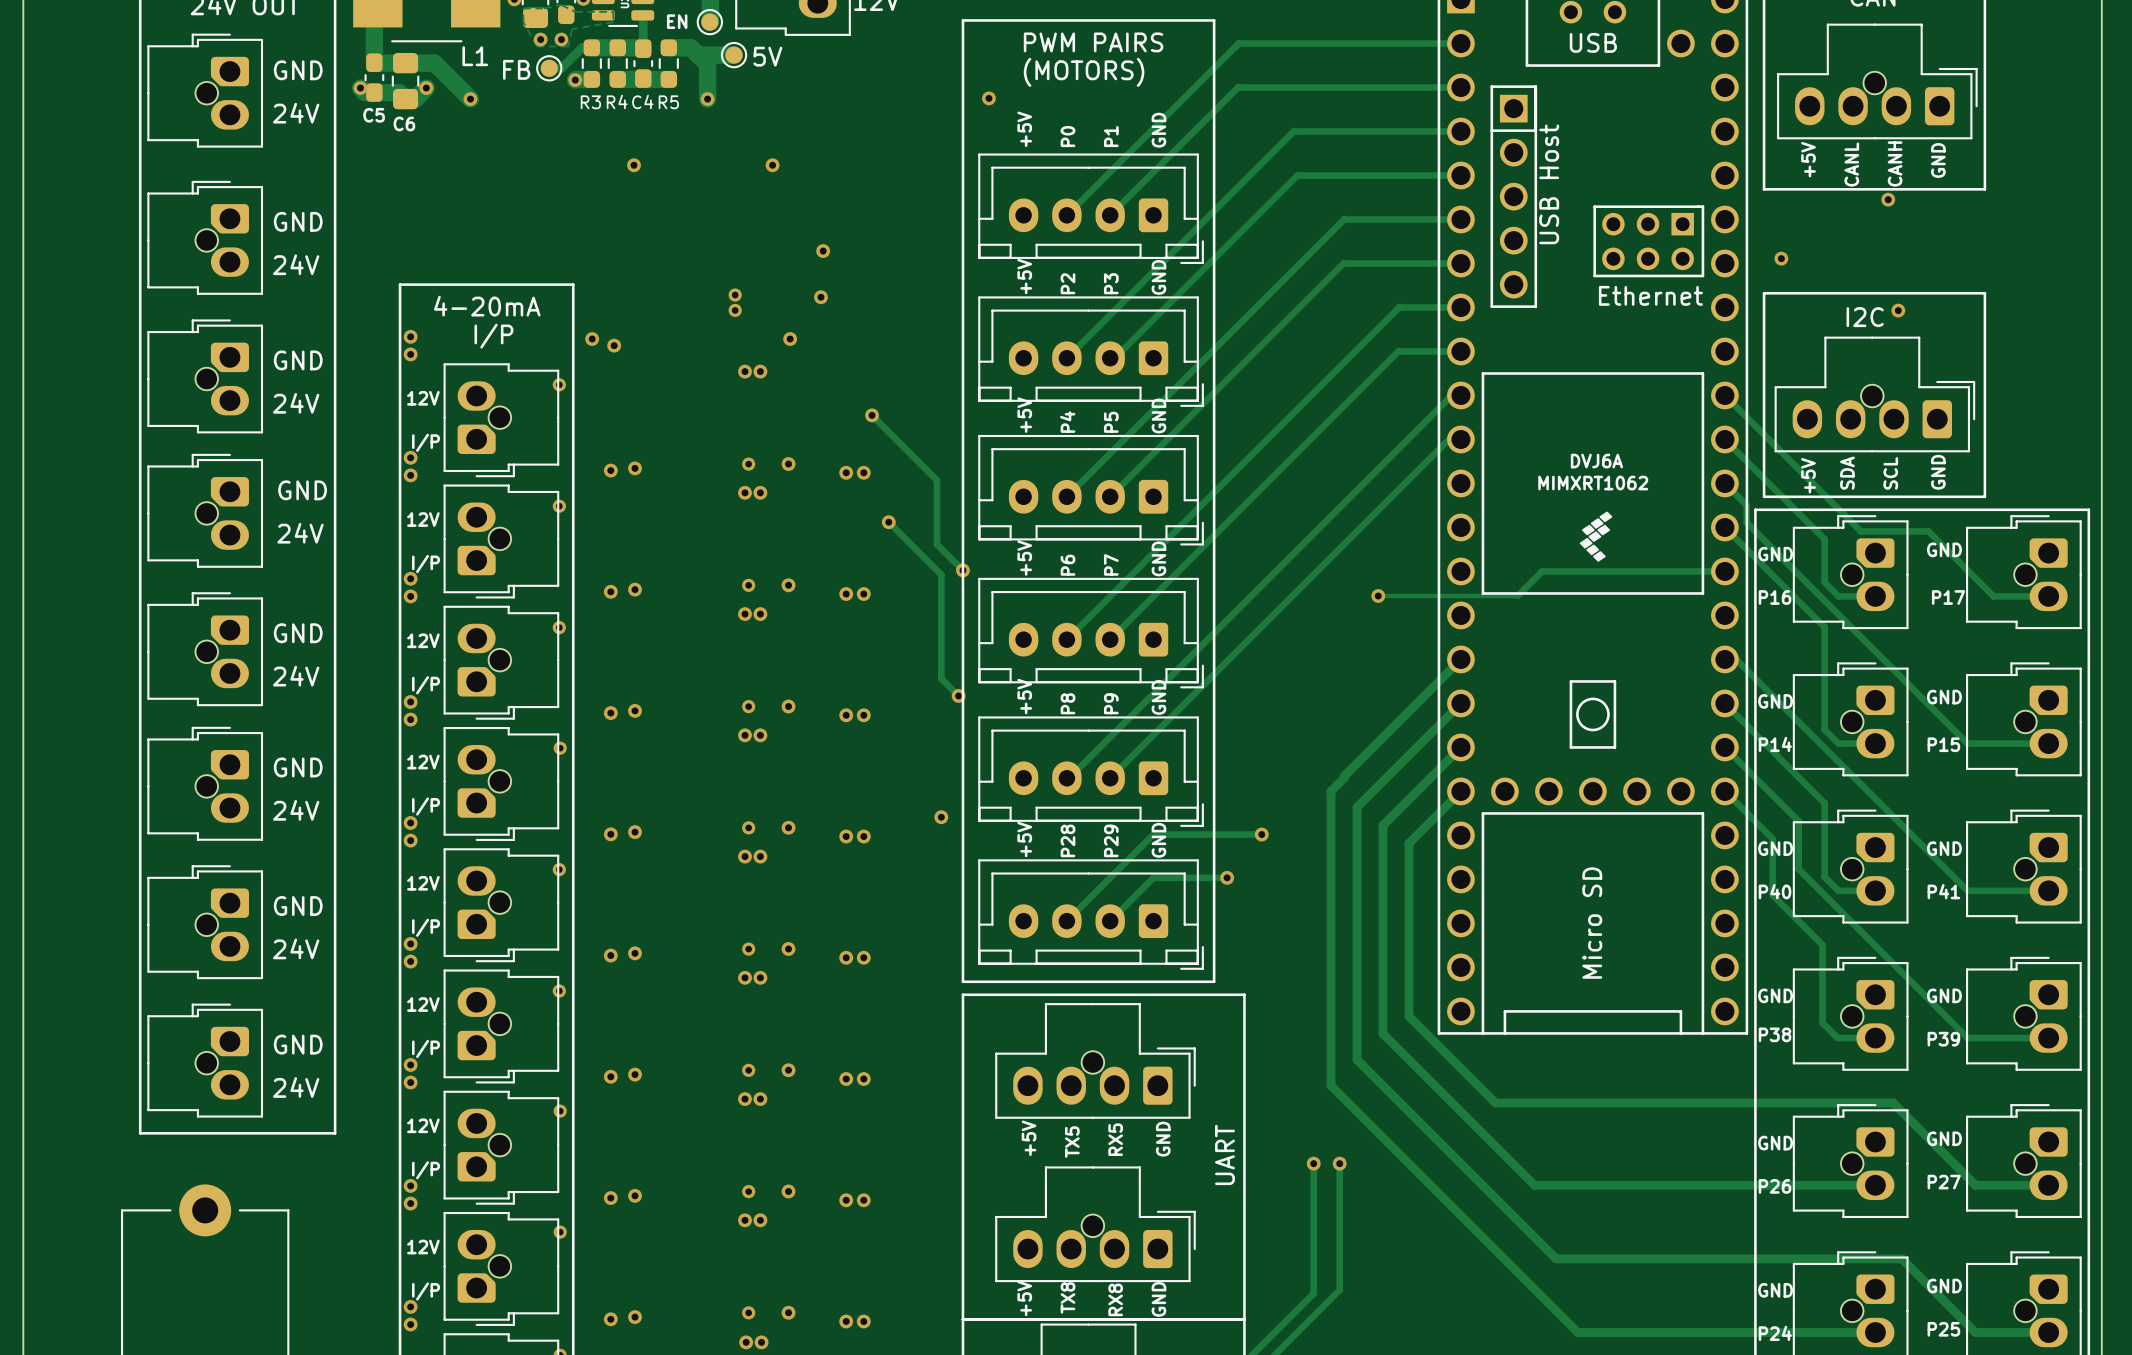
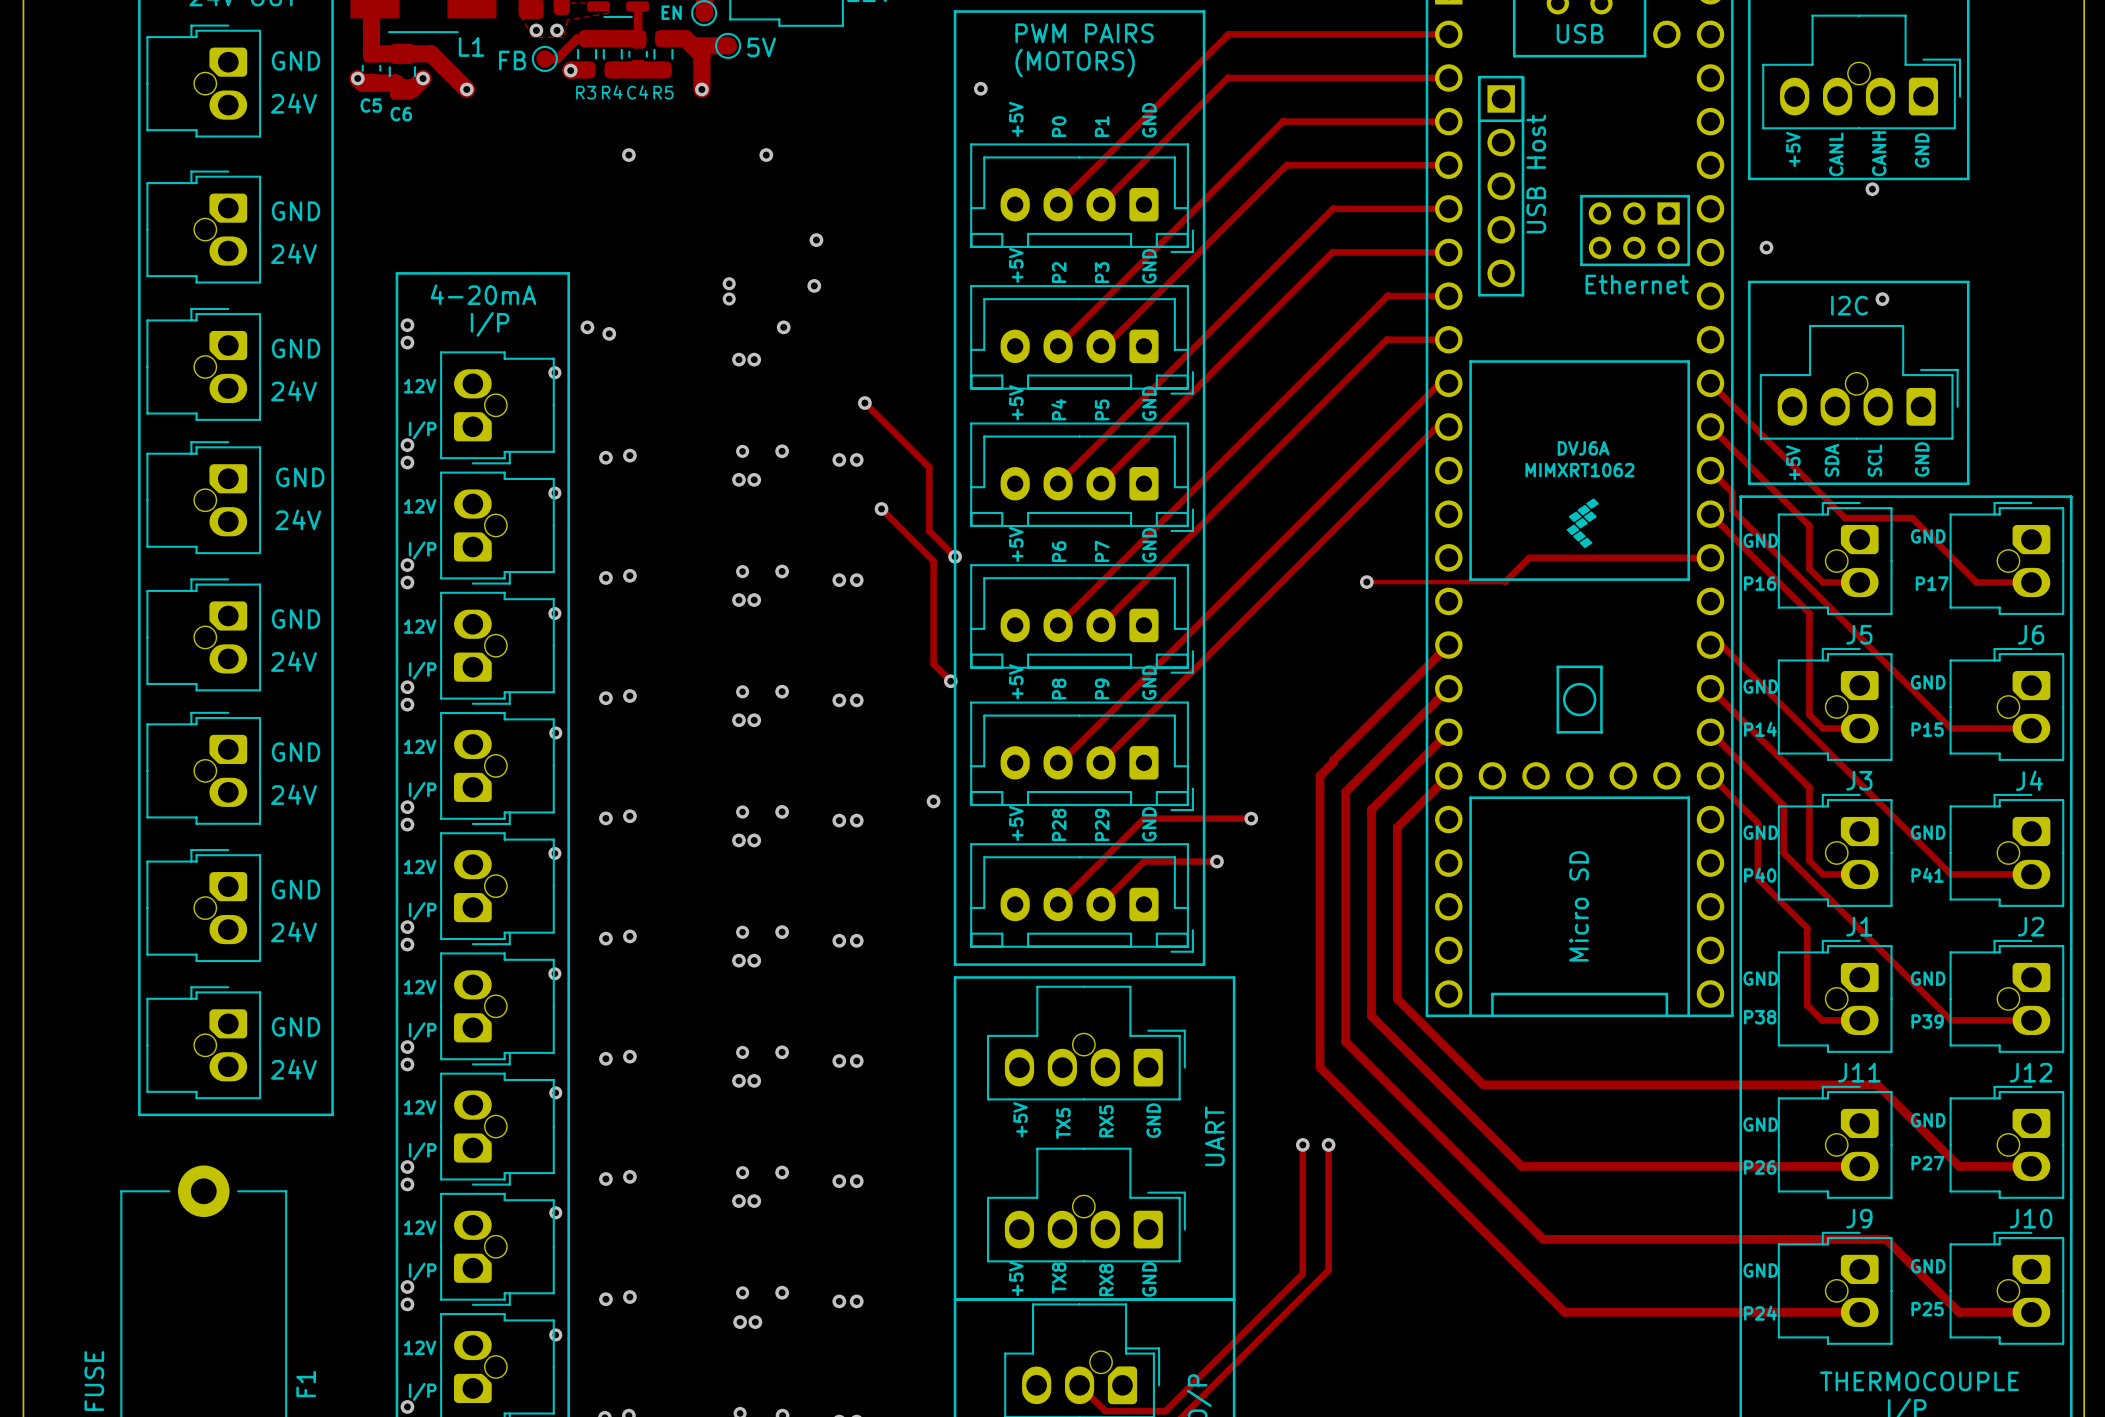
J5 name: none -> J5 (1859, 634)
J6 name: none -> J6 (2031, 634)
J3 name: none -> J3 (1859, 780)
J4 name: none -> J4 (2029, 780)
J1 name: none -> J1 (1859, 926)
J2 name: none -> J2 (2031, 926)
J11 name: none -> J11 (1859, 1072)
J12 name: none -> J12 (2031, 1072)
J9 name: none -> J9 (1859, 1218)
J10 name: none -> J10 (2031, 1218)

